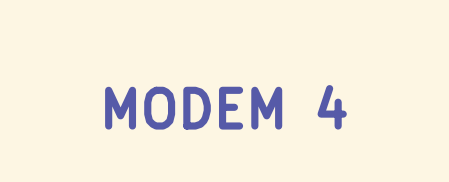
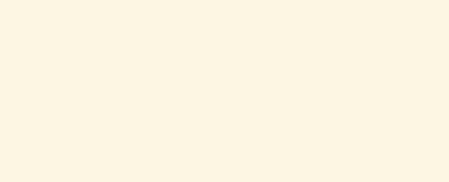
text: MODEM 4 (225, 107) -> none

